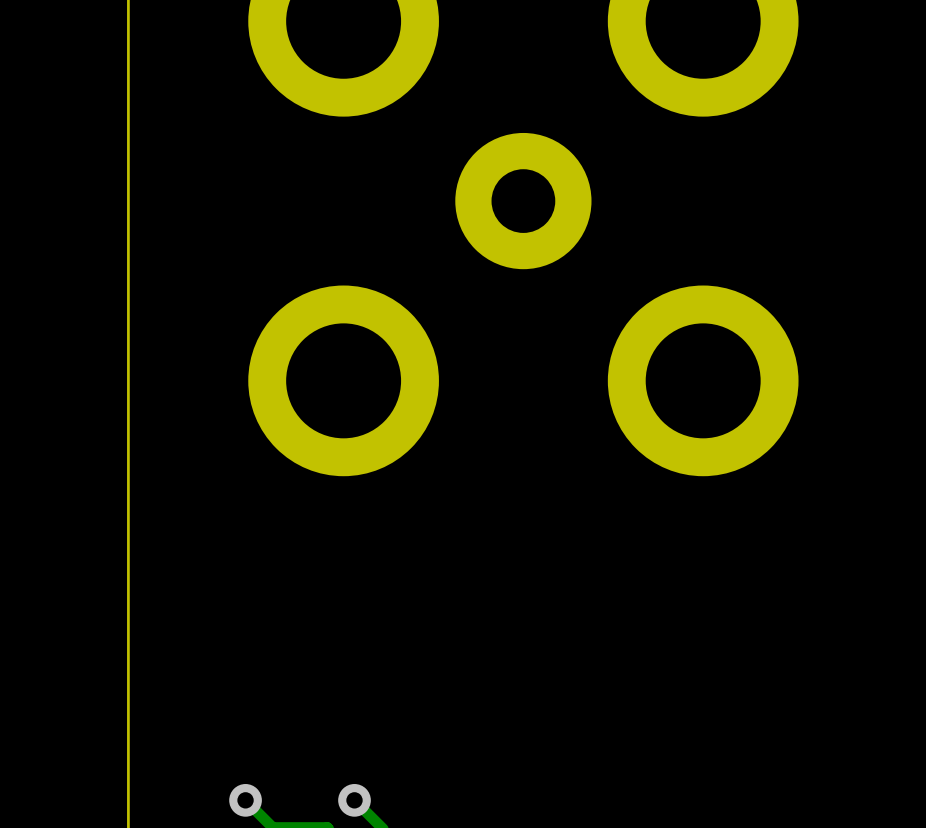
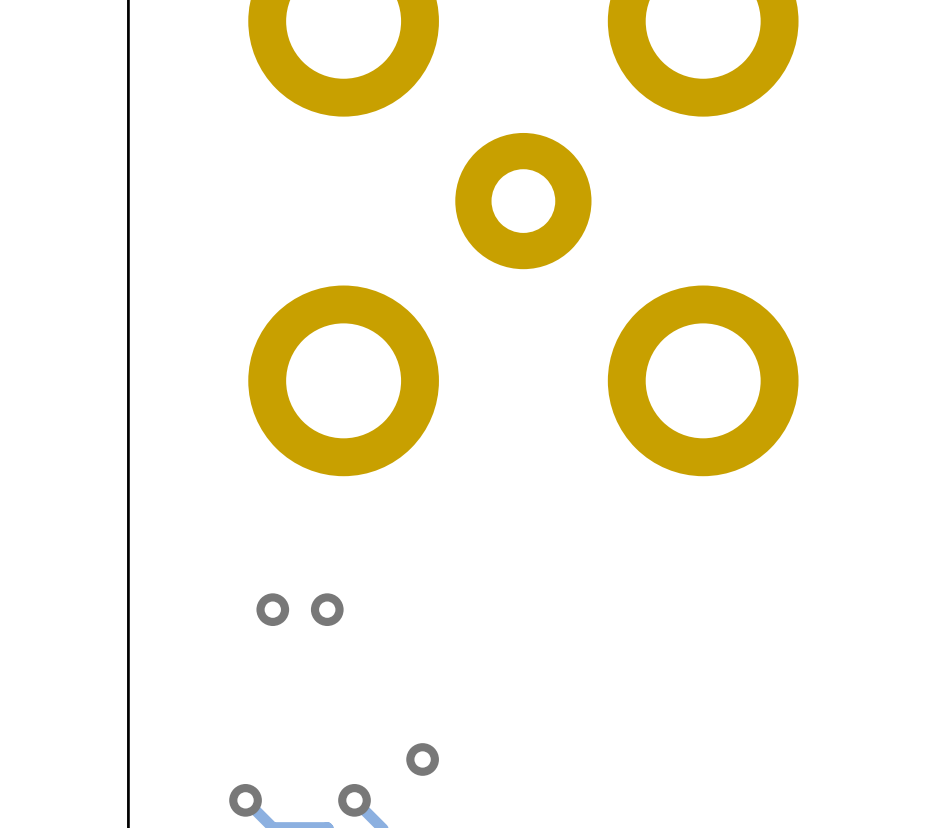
via: none -> (272, 609)
via: none -> (327, 609)
via: none -> (422, 759)

